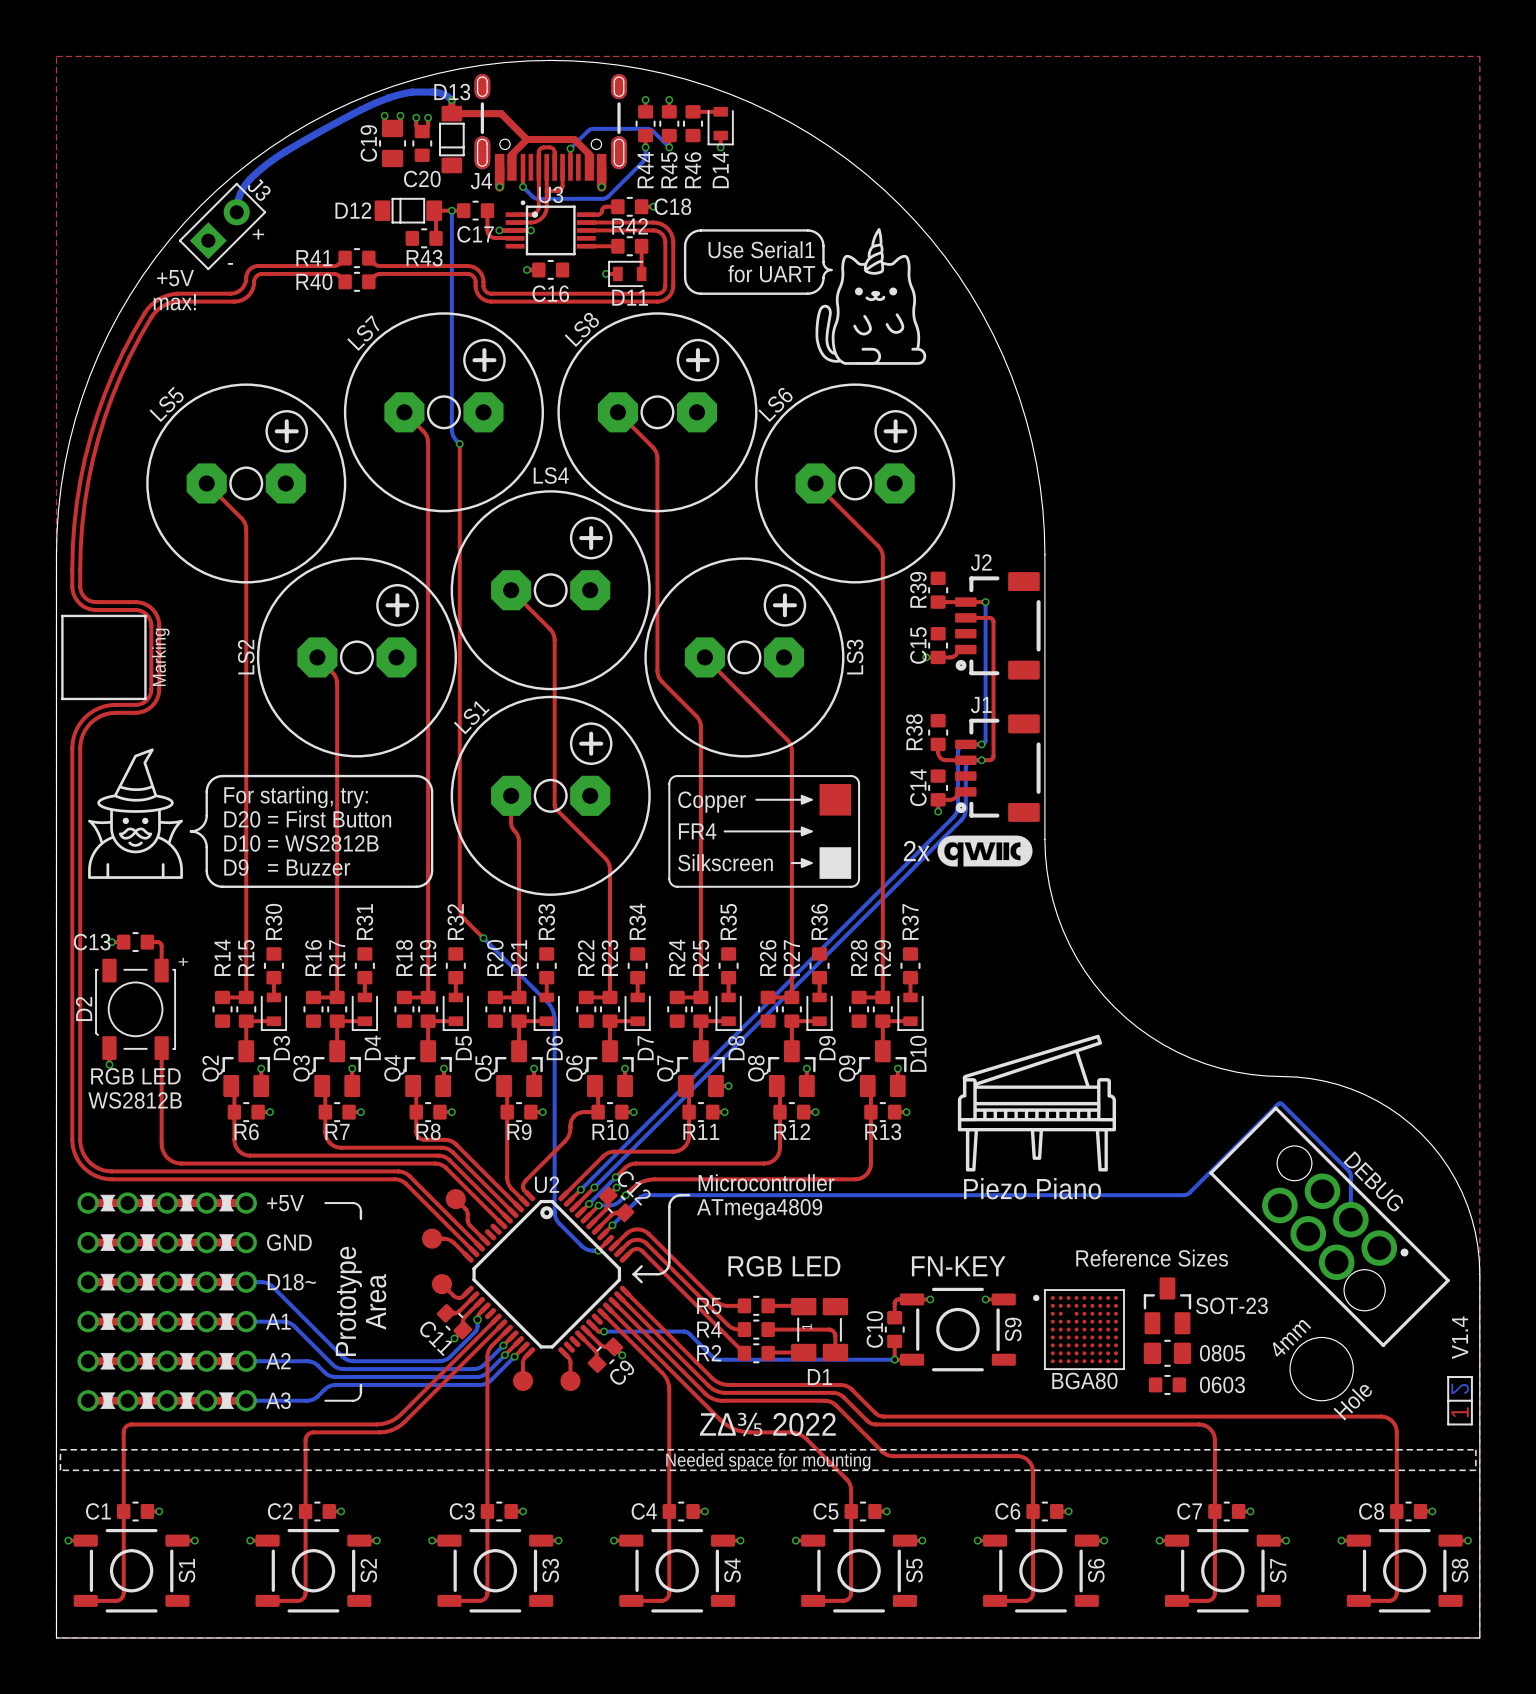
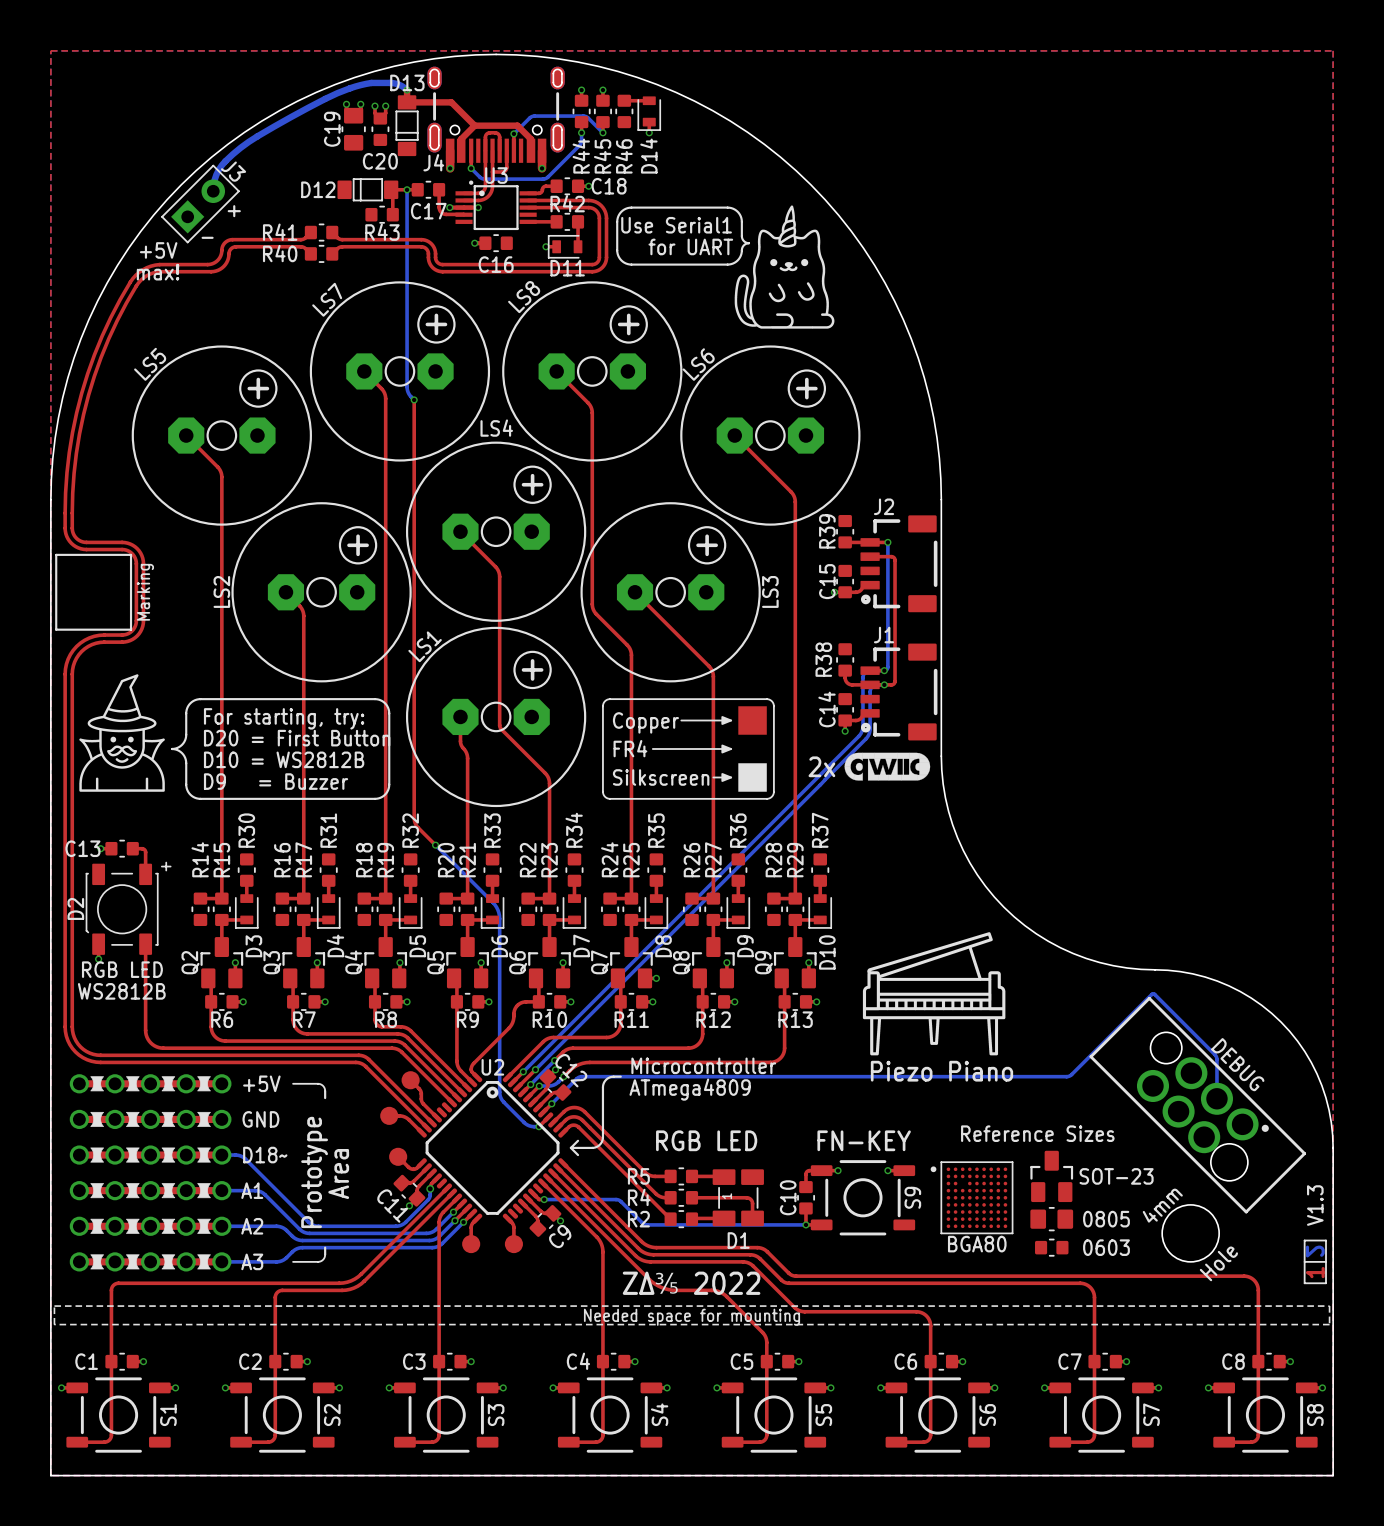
text: V1.4 (1460, 1337) -> V1.3 (1315, 1205)

